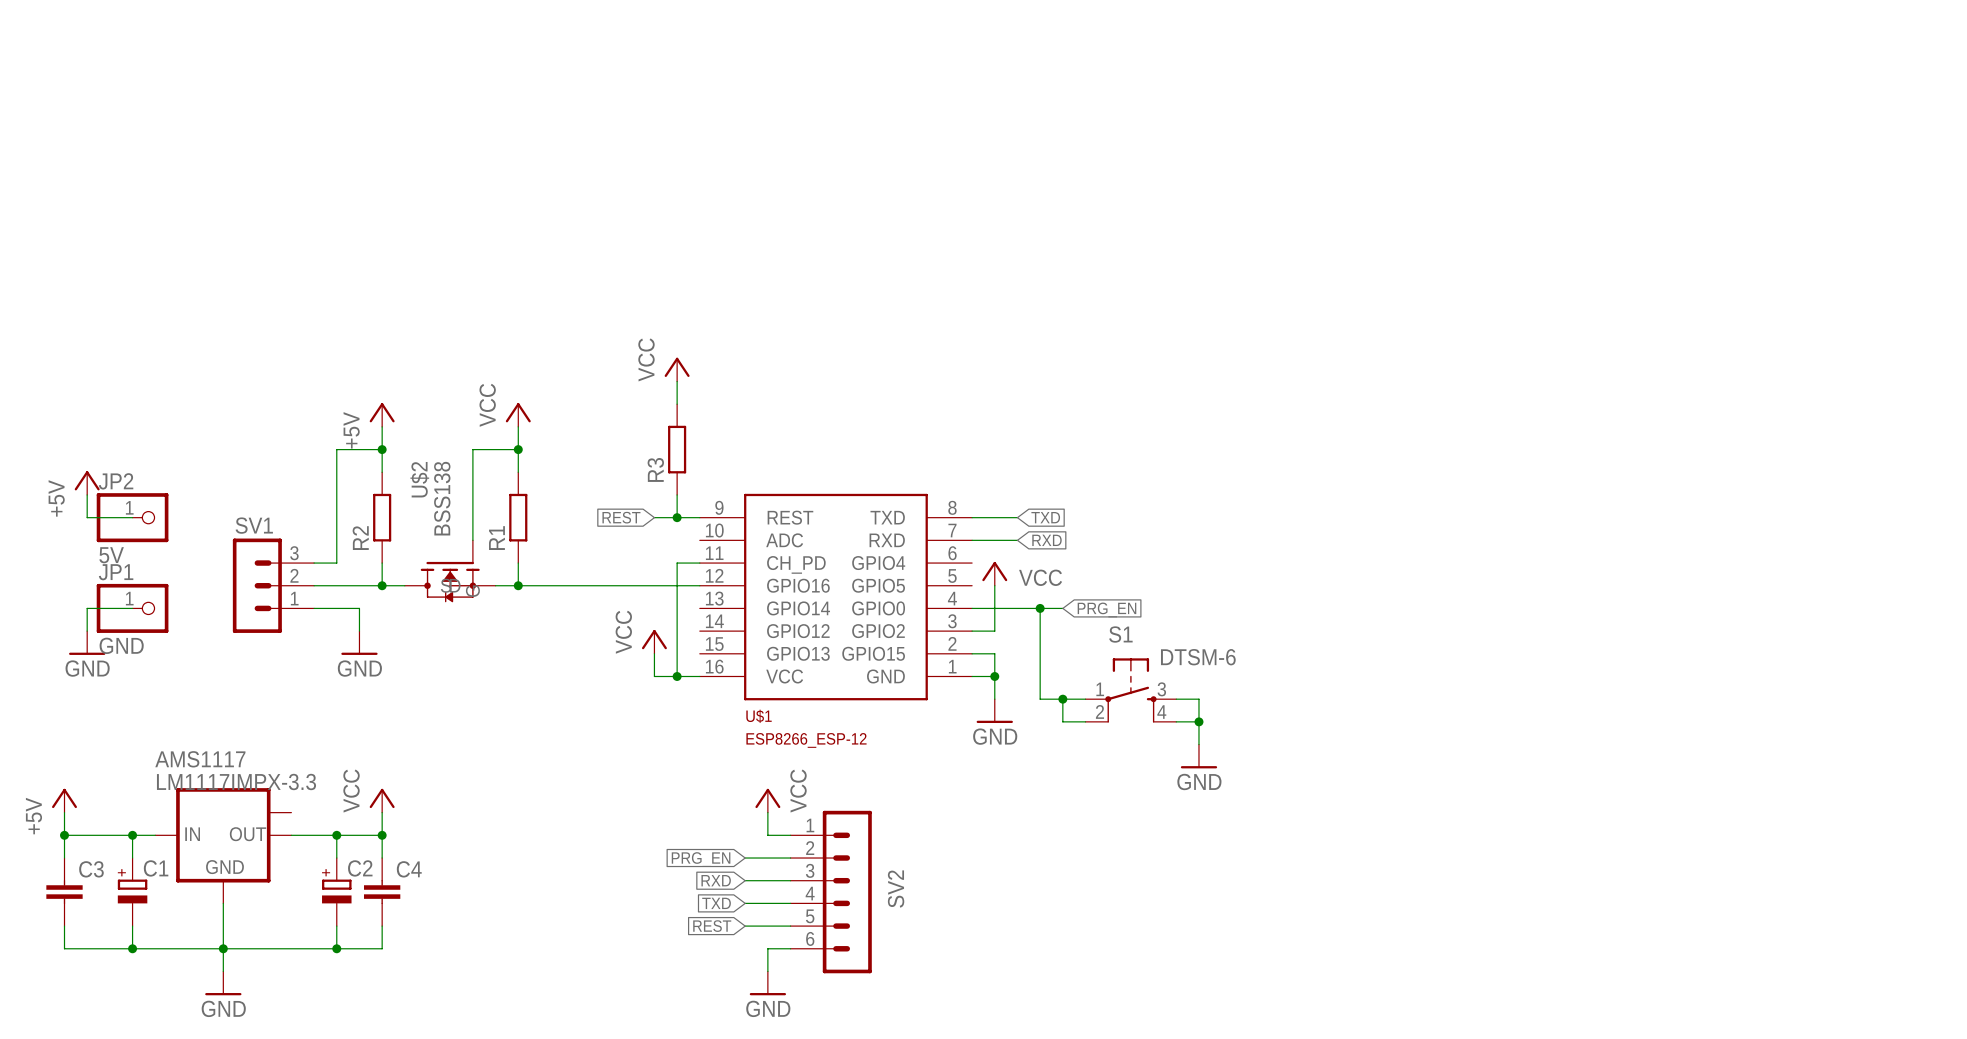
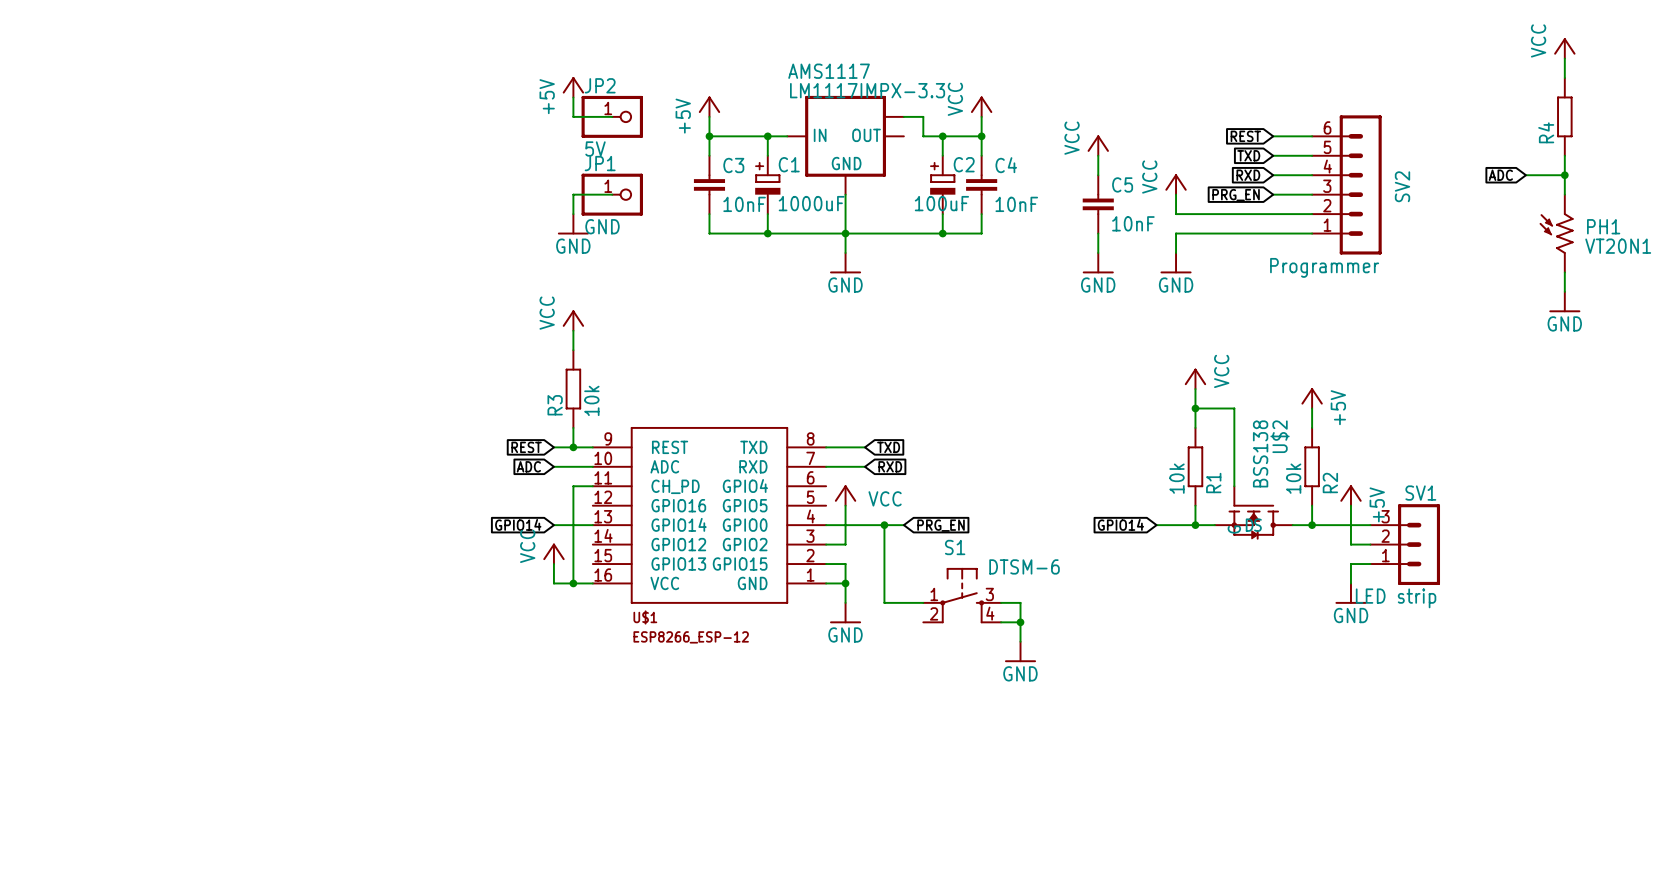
power symbol: none -> VCC (1564, 48)
wire: none -> (1564, 58) (1564, 78)
power symbol: none -> +5V (573, 87)
wire: none -> (573, 97) (573, 116) (612, 116)
power symbol: none -> +5V (709, 106)
power symbol: none -> VCC (981, 106)
wire: none -> (709, 116) (709, 155)
wire: none -> (903, 116) (923, 116) (923, 136) (981, 136)
wire: none -> (981, 116) (981, 155)
R4: none -> (1564, 116)
wire: none -> (709, 136) (787, 136)
junction: none -> (709, 136)
wire: none -> (767, 136) (767, 155)
junction: none -> (767, 136)
wire: none -> (942, 136) (942, 155)
junction: none -> (942, 136)
junction: none -> (981, 136)
global label: none -> REST (1245, 136)
wire: none -> (1273, 136) (1312, 136)
power symbol: none -> VCC (1098, 145)
wire: none -> (1098, 155) (1098, 175)
global label: none -> TXD (1248, 155)
wire: none -> (1273, 155) (1312, 155)
wire: none -> (1564, 155) (1564, 194)
global label: none -> RXD (1248, 175)
wire: none -> (1273, 175) (1312, 175)
global label: none -> ADC (1500, 175)
wire: none -> (1525, 175) (1564, 175)
junction: none -> (1564, 175)
power symbol: none -> VCC (1176, 184)
wire: none -> (612, 194) (573, 194) (573, 214)
wire: none -> (845, 194) (845, 252)
wire: none -> (1176, 194) (1176, 214) (1312, 214)
wire: none -> (1273, 194) (1312, 194)
global label: none -> PRG_EN (1236, 195)
C1 value: none -> 1000uF (811, 203)
C2 value: none -> 100uF (941, 203)
C3 value: none -> 10nF (744, 204)
C4 value: none -> 10nF (1016, 204)
C5: none -> 10nF (1098, 204)
wire: none -> (709, 214) (709, 233) (981, 233) (981, 214)
wire: none -> (767, 214) (767, 233)
wire: none -> (942, 214) (942, 233)
power symbol: none -> GND (573, 224)
junction: none -> (767, 233)
junction: none -> (845, 233)
junction: none -> (942, 233)
wire: none -> (1098, 233) (1098, 252)
wire: none -> (1312, 233) (1176, 233) (1176, 252)
PH1: none -> VT20N1 (1556, 233)
power symbol: none -> GND (845, 263)
power symbol: none -> GND (1098, 263)
power symbol: none -> GND (1176, 263)
SV2 value: none -> Programmer (1324, 267)
wire: none -> (1564, 272) (1564, 291)
power symbol: none -> GND (1564, 302)
power symbol: +5V (382, 414) -> none
power symbol: VCC (518, 414) -> none
wire: (382, 426) (382, 472) -> none
wire: (518, 426) (518, 472) -> none
power symbol: none -> VCC (1195, 378)
wire: (382, 449) (336, 449) (336, 563) (314, 563) -> none
junction: (382, 449) -> none
wire: (518, 449) (472, 449) (472, 540) -> none
junction: (518, 449) -> none
wire: none -> (1195, 389) (1195, 427)
power symbol: none -> +5V (1312, 398)
R3 value: none -> 10k (591, 400)
wire: none -> (1195, 408) (1234, 408) (1234, 486)
junction: none -> (1195, 408)
wire: none -> (1312, 408) (1312, 427)
power symbol: +5V (87, 483) -> none
wire: (87, 494) (87, 517) (132, 517) -> none
JP2 position: (132, 517) -> (612, 116)
R2 position: (382, 517) -> (1312, 466)
R1 position: (518, 517) -> (1195, 466)
R2 name position: R2 (360, 538) -> R2 (1330, 483)
R1 name position: R1 (496, 538) -> R1 (1213, 483)
global label: none -> ADC (528, 466)
wire: none -> (553, 466) (592, 466)
R1 value: none -> 10k (1177, 478)
R2 value: none -> 10k (1293, 478)
wire: (382, 563) (382, 585) -> none
wire: (518, 563) (518, 585) -> none
U$2 position: (450, 571) -> (1253, 512)
power symbol: none -> +5V (1350, 495)
U$2 flip: as is (450, 582) -> left-right (1253, 522)
SV1 flip: as is (257, 585) -> left-right (1419, 544)
SV1 position: (273, 585) -> (1405, 544)
wire: (314, 585) (404, 585) -> none
junction: (382, 585) -> none
wire: (495, 585) (699, 585) -> none
junction: (518, 585) -> none
wire: none -> (1195, 505) (1195, 525)
wire: none -> (1312, 505) (1312, 525)
wire: none -> (1350, 505) (1350, 544) (1370, 544)
wire: (132, 608) (87, 608) (87, 631) -> none
JP1 position: (132, 608) -> (612, 194)
wire: (314, 608) (359, 608) (359, 631) -> none
global label: none -> GPIO14 (518, 524)
wire: none -> (553, 525) (592, 525)
global label: none -> GPIO14 (1120, 524)
wire: none -> (1156, 525) (1214, 525)
junction: none -> (1195, 525)
wire: none -> (1292, 525) (1370, 525)
junction: none -> (1312, 525)
power symbol: GND (87, 643) -> none
power symbol: GND (359, 643) -> none
wire: none -> (1370, 564) (1350, 564) (1350, 583)
power symbol: none -> GND (1350, 593)
SV1 value: none -> LED strip (1396, 598)
wire: (1062, 699) (1062, 721) (1085, 721) -> none
junction: (1062, 699) -> none
power symbol: +5V (64, 800) -> none
power symbol: VCC (382, 800) -> none
power symbol: VCC (767, 800) -> none
wire: (64, 812) (64, 858) -> none
wire: (382, 812) (382, 858) -> none
wire: (767, 812) (767, 835) (790, 835) -> none
wire: (64, 835) (155, 835) -> none
junction: (64, 835) -> none
wire: (132, 835) (132, 858) -> none
junction: (132, 835) -> none
wire: (291, 835) (382, 835) -> none
wire: (336, 835) (336, 858) -> none
junction: (336, 835) -> none
junction: (382, 835) -> none
AMS1117 position: (223, 845) -> (845, 145)
wire: (745, 858) (790, 858) -> none
global label: PRG_EN (701, 859) -> none
global label: RXD (716, 880) -> none
wire: (745, 880) (790, 880) -> none
C3 position: (64, 892) -> (709, 184)
C1 position: (132, 892) -> (767, 184)
C2 position: (336, 892) -> (942, 184)
C4 position: (382, 892) -> (981, 184)
SV2 position: (831, 892) -> (1346, 184)
SV2 flip: as is (847, 892) -> up-down (1360, 184)
wire: (223, 903) (223, 971) -> none
global label: TXD (716, 903) -> none
wire: (745, 903) (790, 903) -> none
wire: (64, 926) (64, 948) (382, 948) (382, 926) -> none
wire: (132, 926) (132, 948) -> none
wire: (336, 926) (336, 948) -> none
global label: REST (712, 926) -> none
wire: (745, 926) (790, 926) -> none
junction: (132, 948) -> none
junction: (223, 948) -> none
junction: (336, 948) -> none
wire: (790, 948) (767, 948) (767, 971) -> none
power symbol: GND (223, 983) -> none
power symbol: GND (767, 983) -> none

